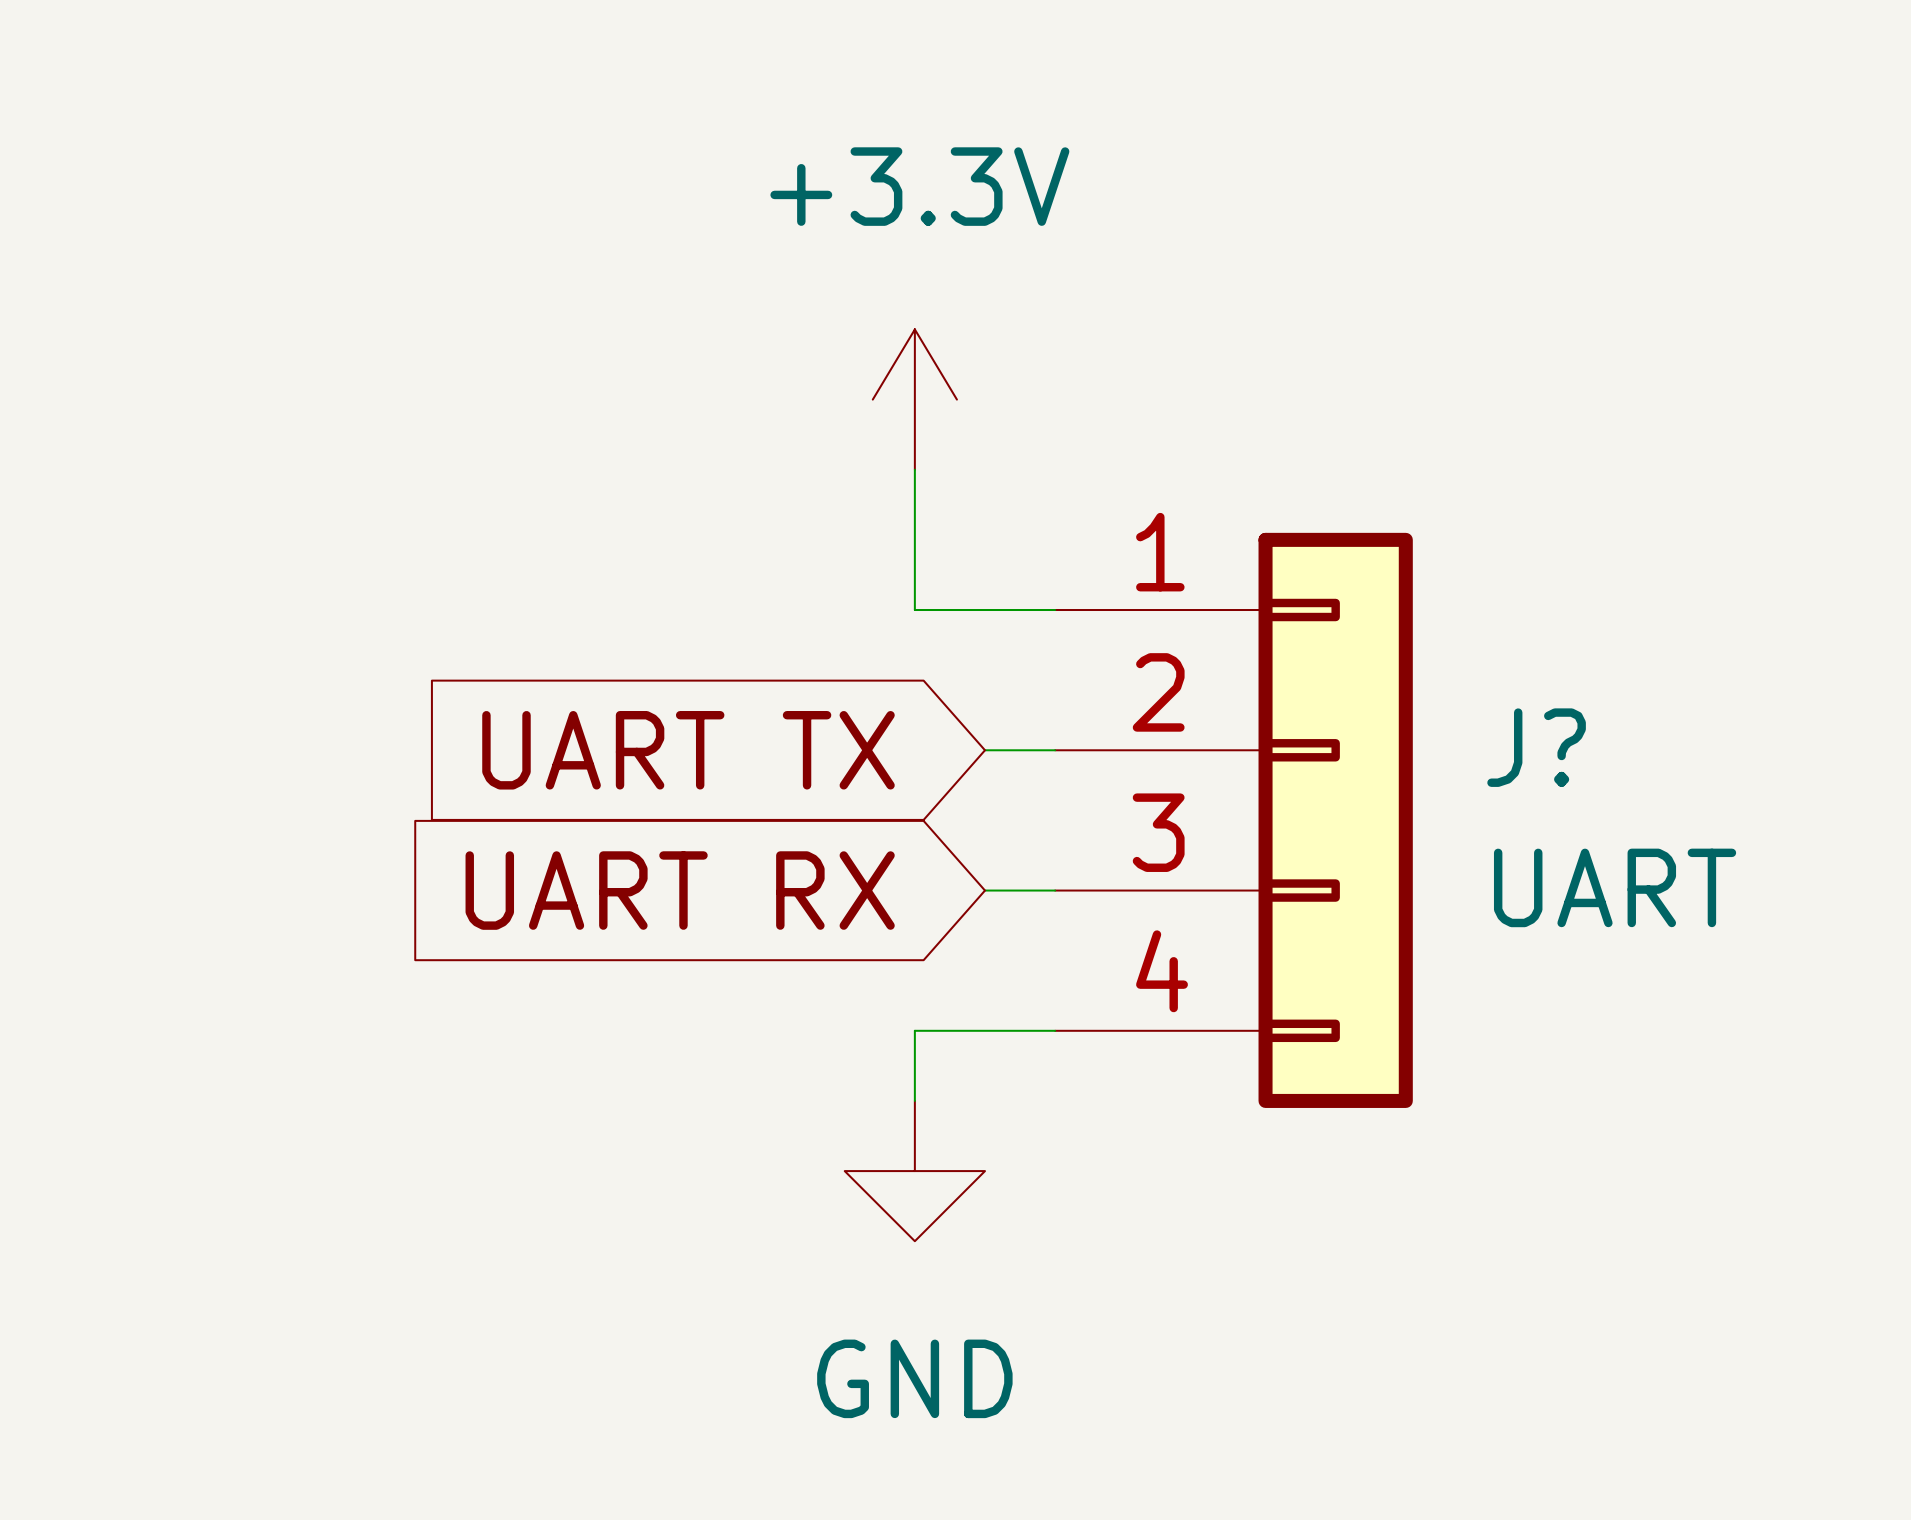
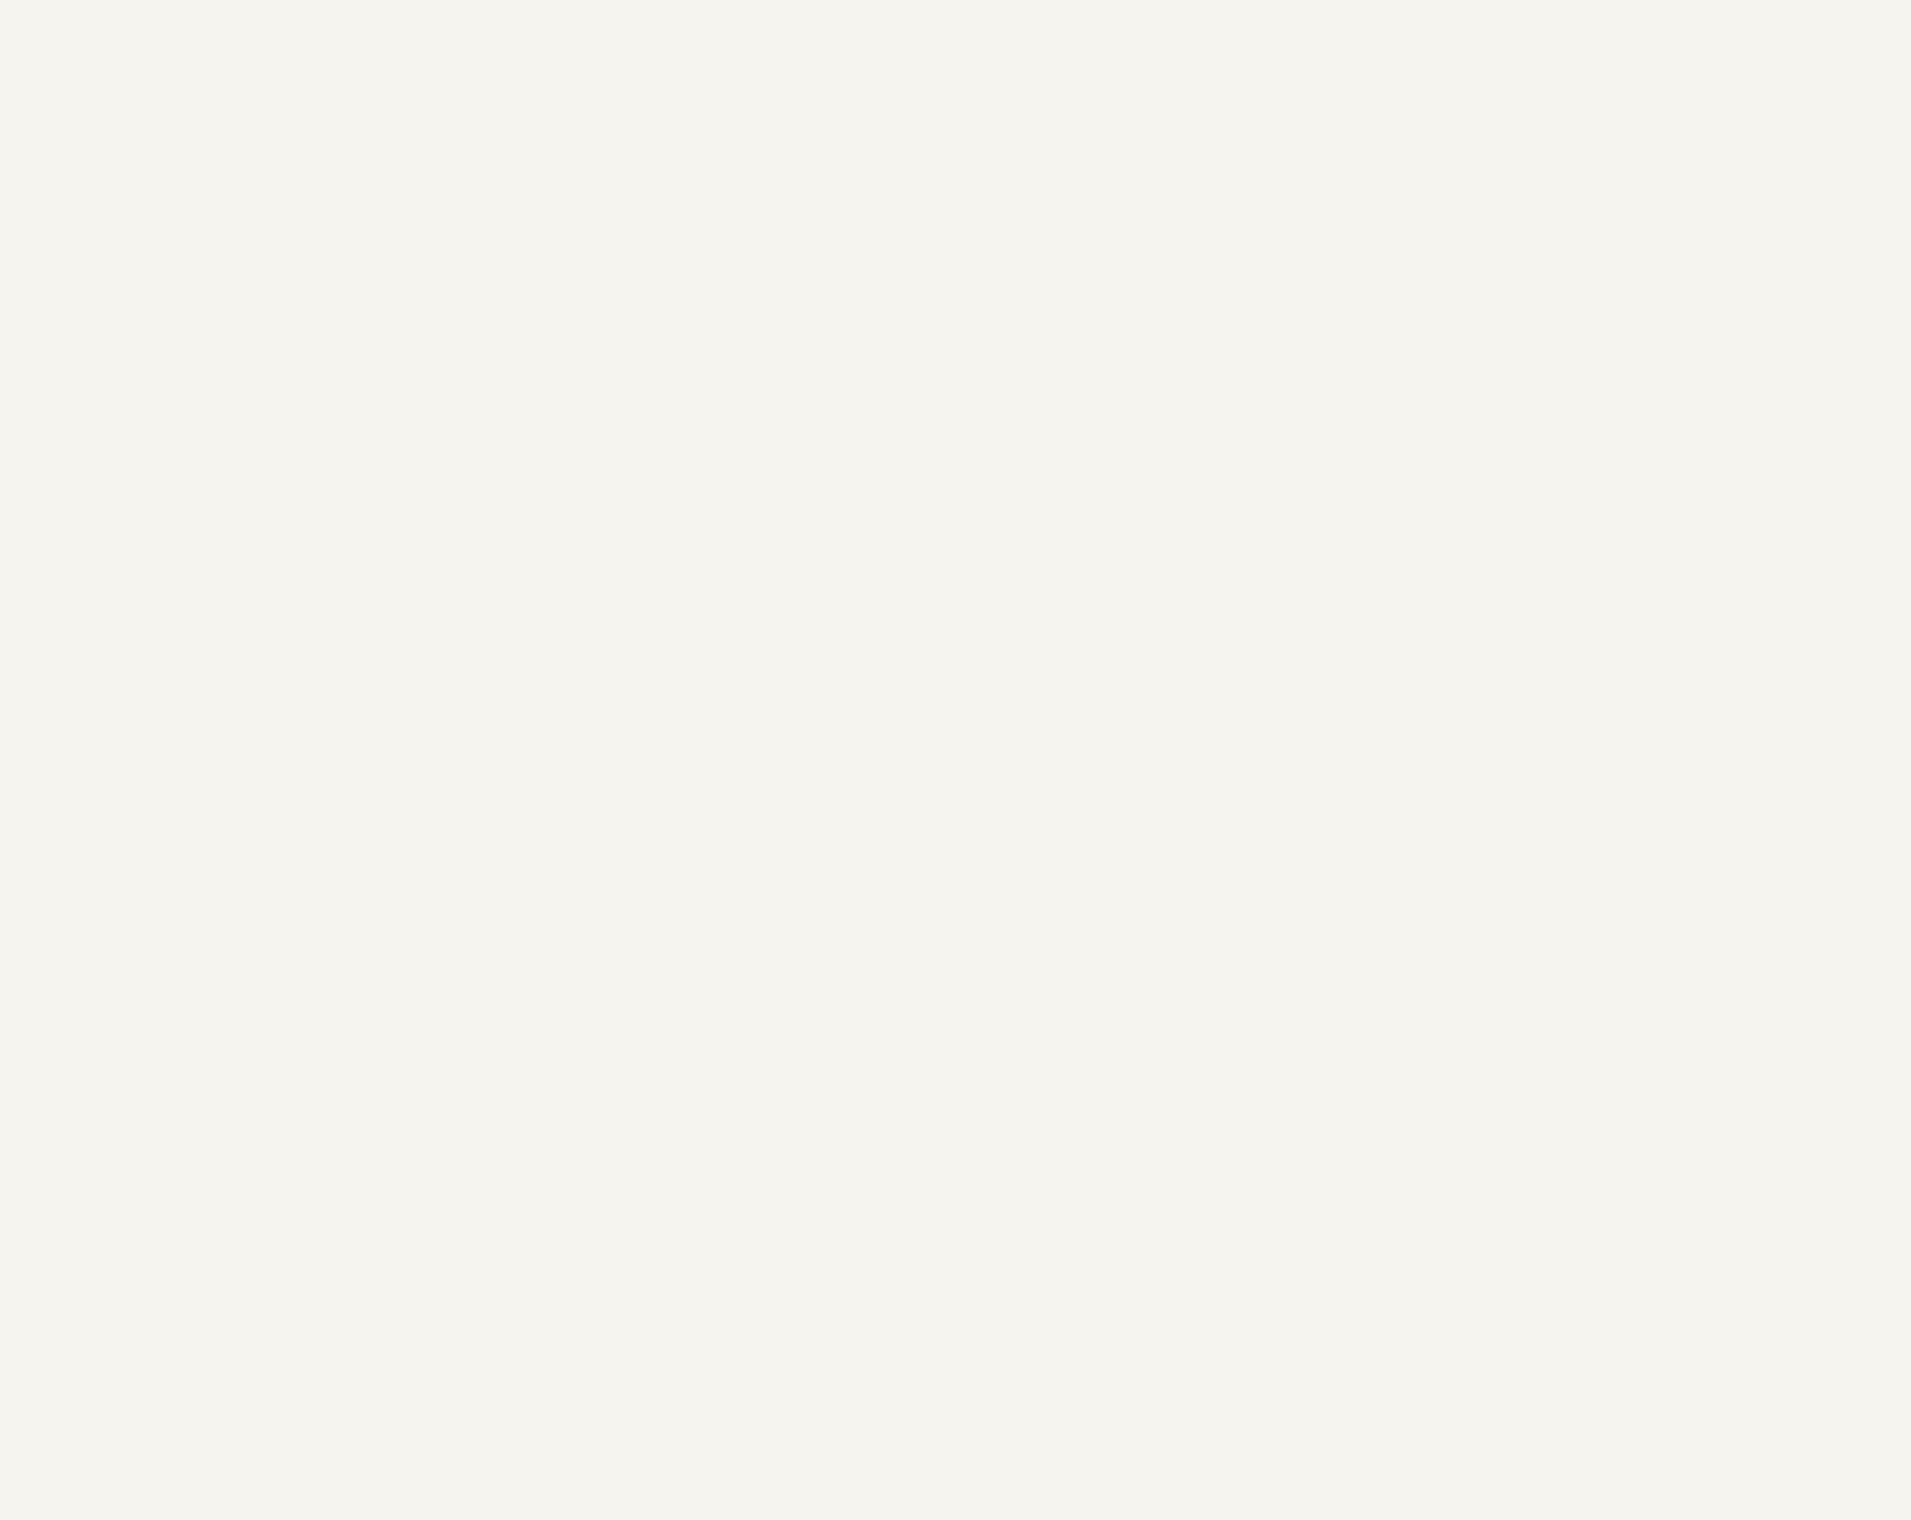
power symbol: +3.3V (914, 399) -> none
wire: (914, 469) (914, 610) (1055, 610) -> none
global label: UART TX (688, 750) -> none
wire: (985, 750) (1055, 750) -> none
J?: UART (1233, 820) -> none
global label: UART RX (680, 890) -> none
wire: (985, 890) (1055, 890) -> none
wire: (1055, 1030) (914, 1030) (914, 1100) -> none
power symbol: GND (914, 1171) -> none

